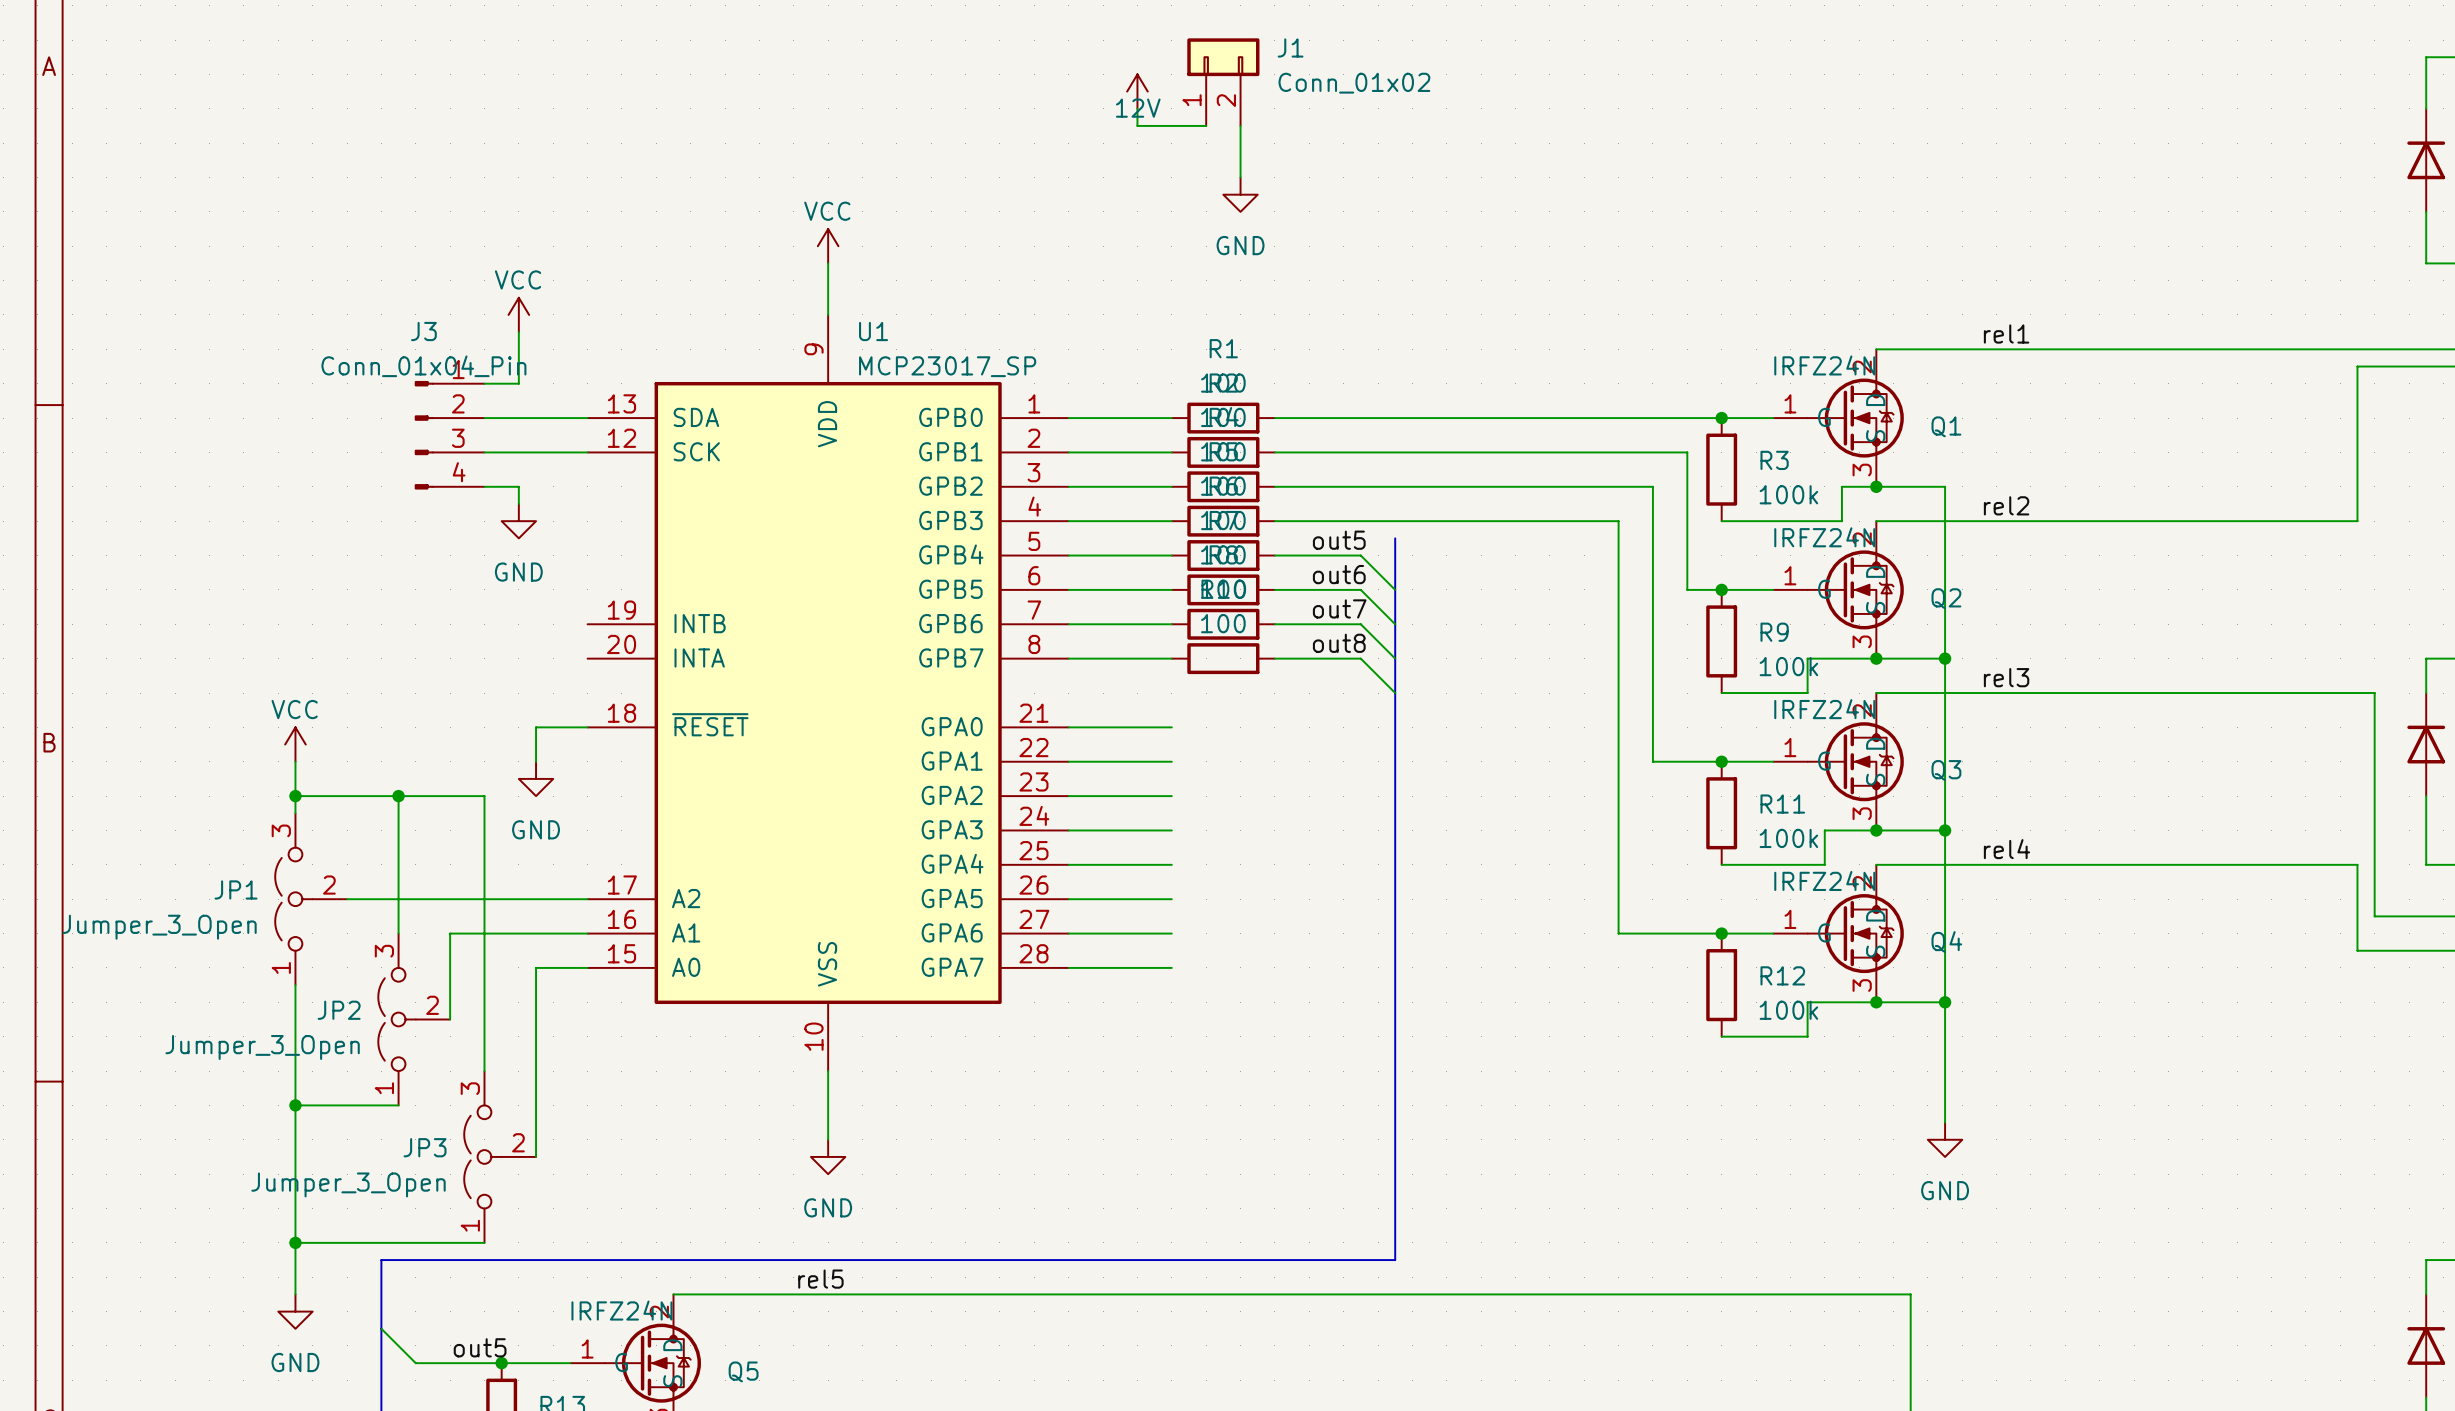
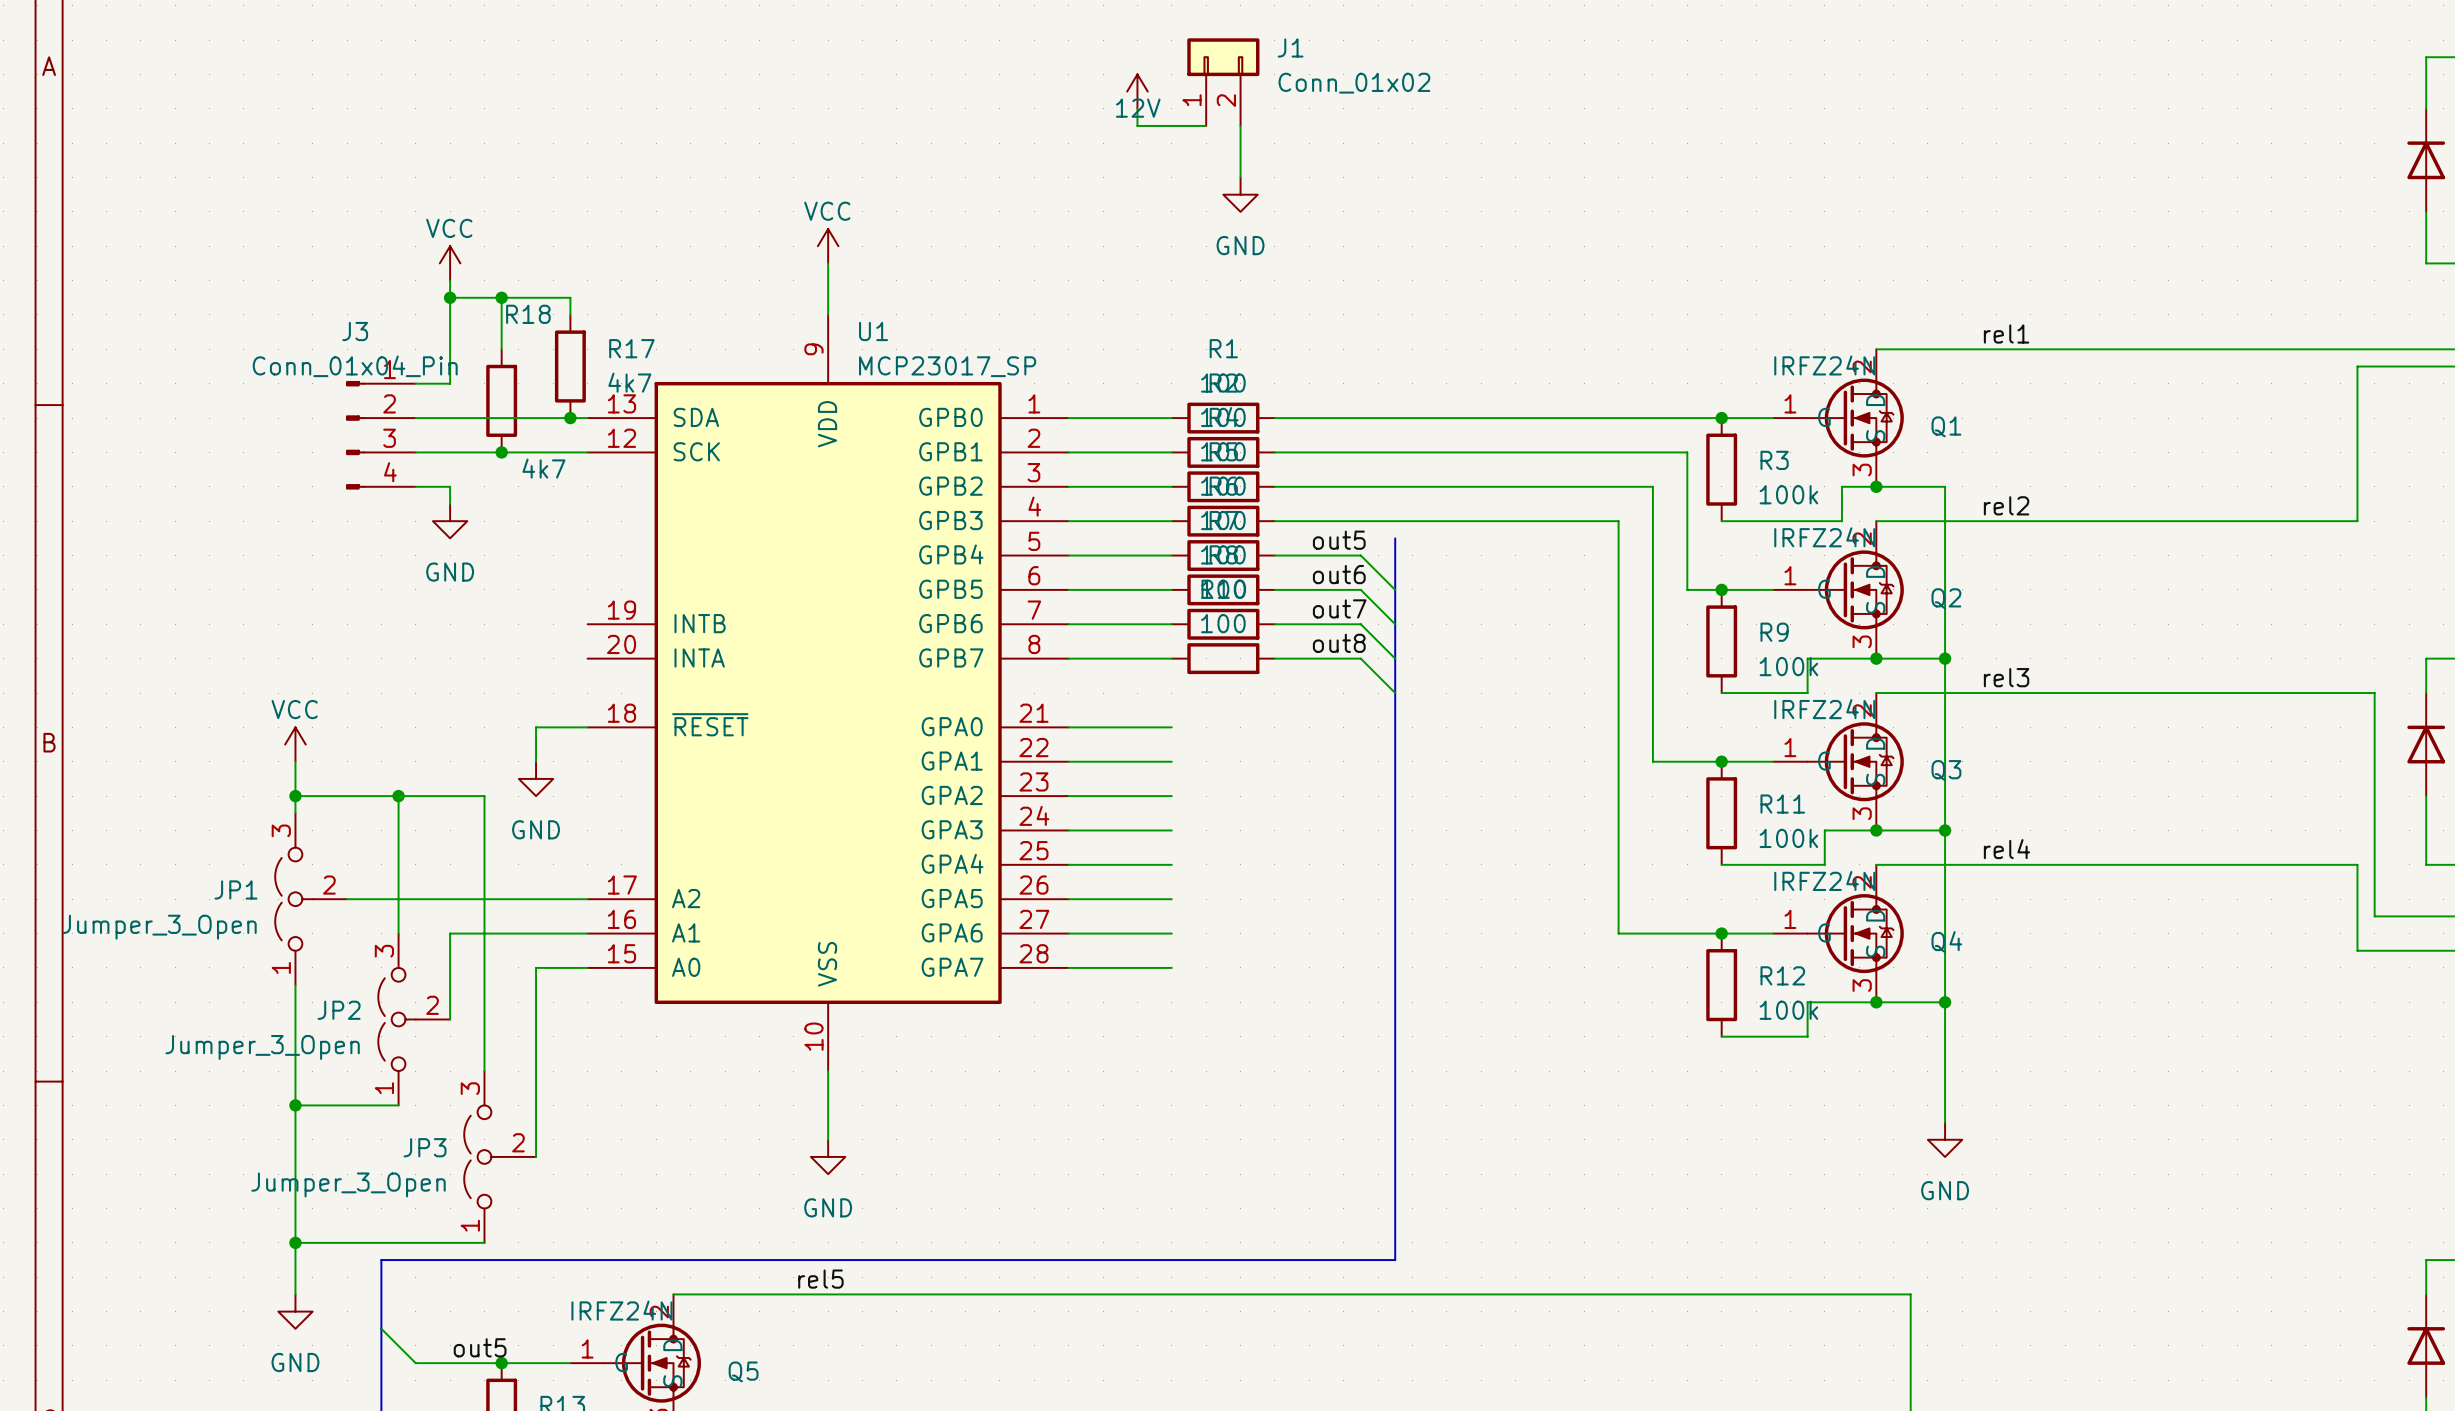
wire: none -> (450, 280) (450, 383) (415, 383)
wire: none -> (450, 297) (570, 297) (570, 314)
junction: none -> (450, 297)
wire: none -> (501, 297) (501, 349)
junction: none -> (501, 297)
power symbol position: VCC (518, 314) -> VCC (450, 263)
wire: (518, 332) (518, 383) (484, 383) -> none
R17: none -> 4k7 (570, 366)
R18: none -> 4k7 (501, 400)
junction: none -> (570, 418)
J3 position: (449, 435) -> (380, 435)
junction: none -> (501, 452)
wire: (484, 486) (518, 486) (518, 503) -> (415, 486) (450, 486) (450, 503)
power symbol position: GND (518, 521) -> GND (450, 521)

